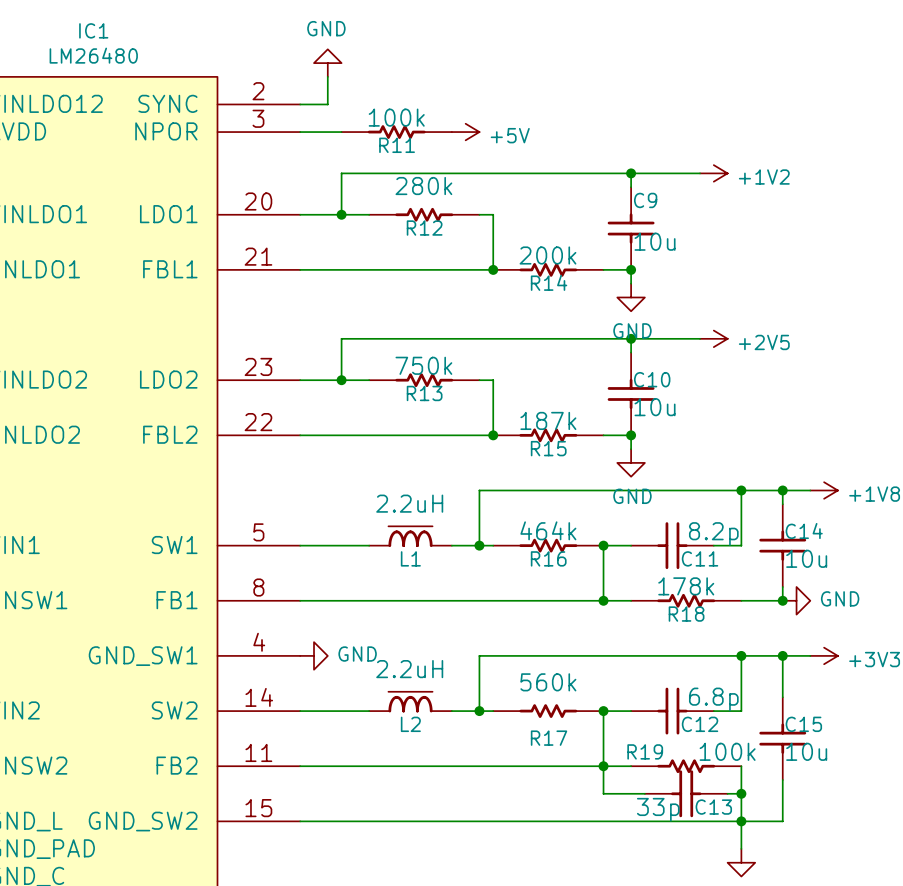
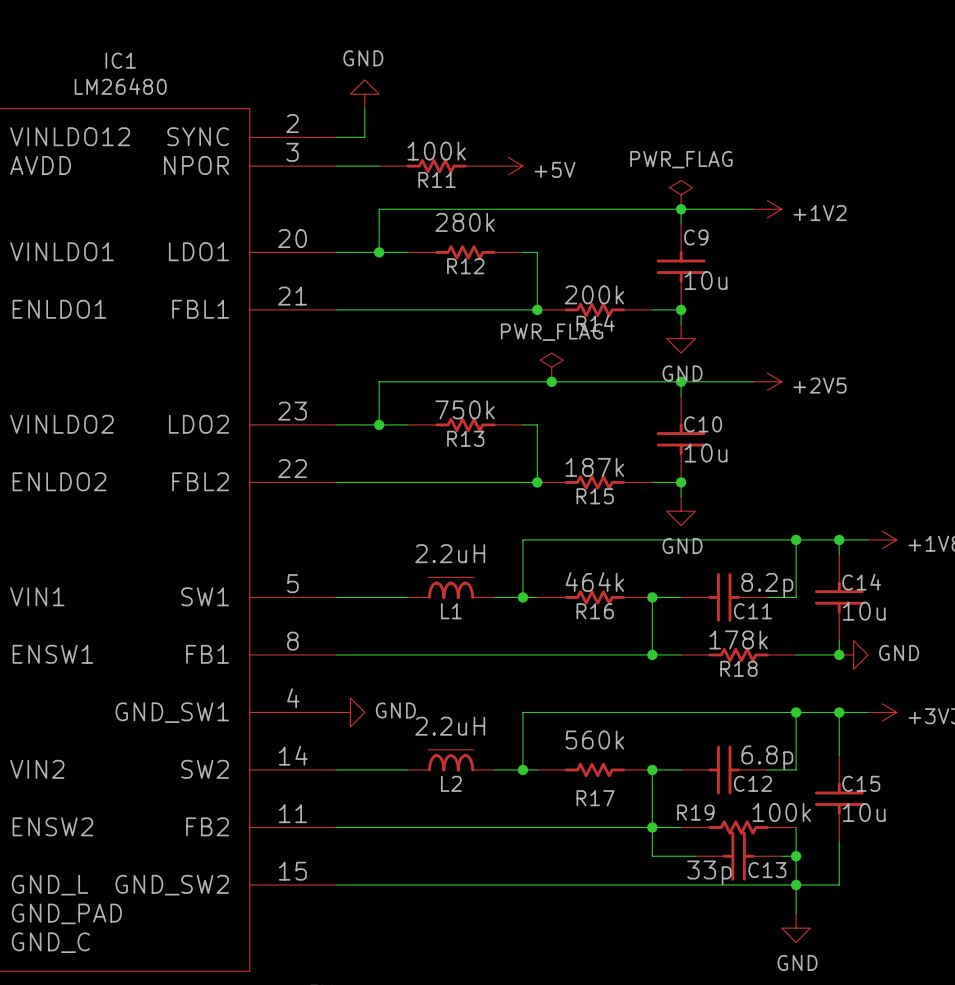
power symbol: none -> PWR_FLAG (681, 194)
power symbol: none -> PWR_FLAG (551, 367)
junction: none -> (551, 381)

